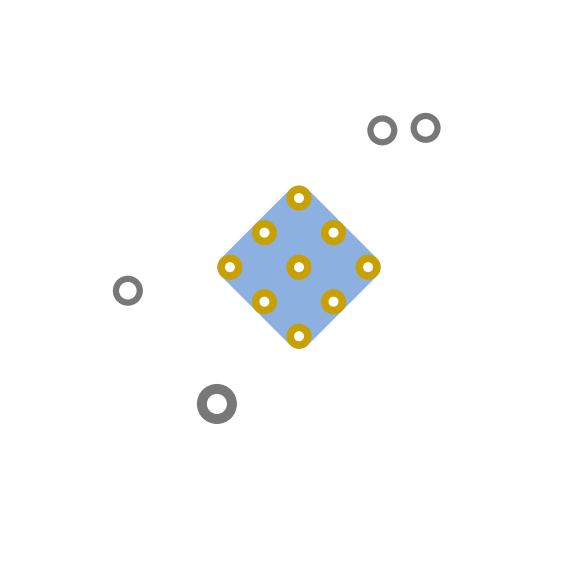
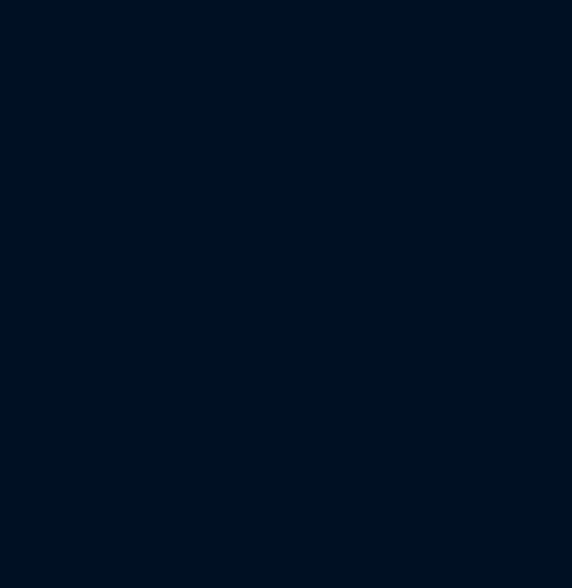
via: (425, 127) -> none
via: (382, 130) -> none
part: (298, 267) -> none
via: (127, 290) -> none
via: (216, 403) -> none

